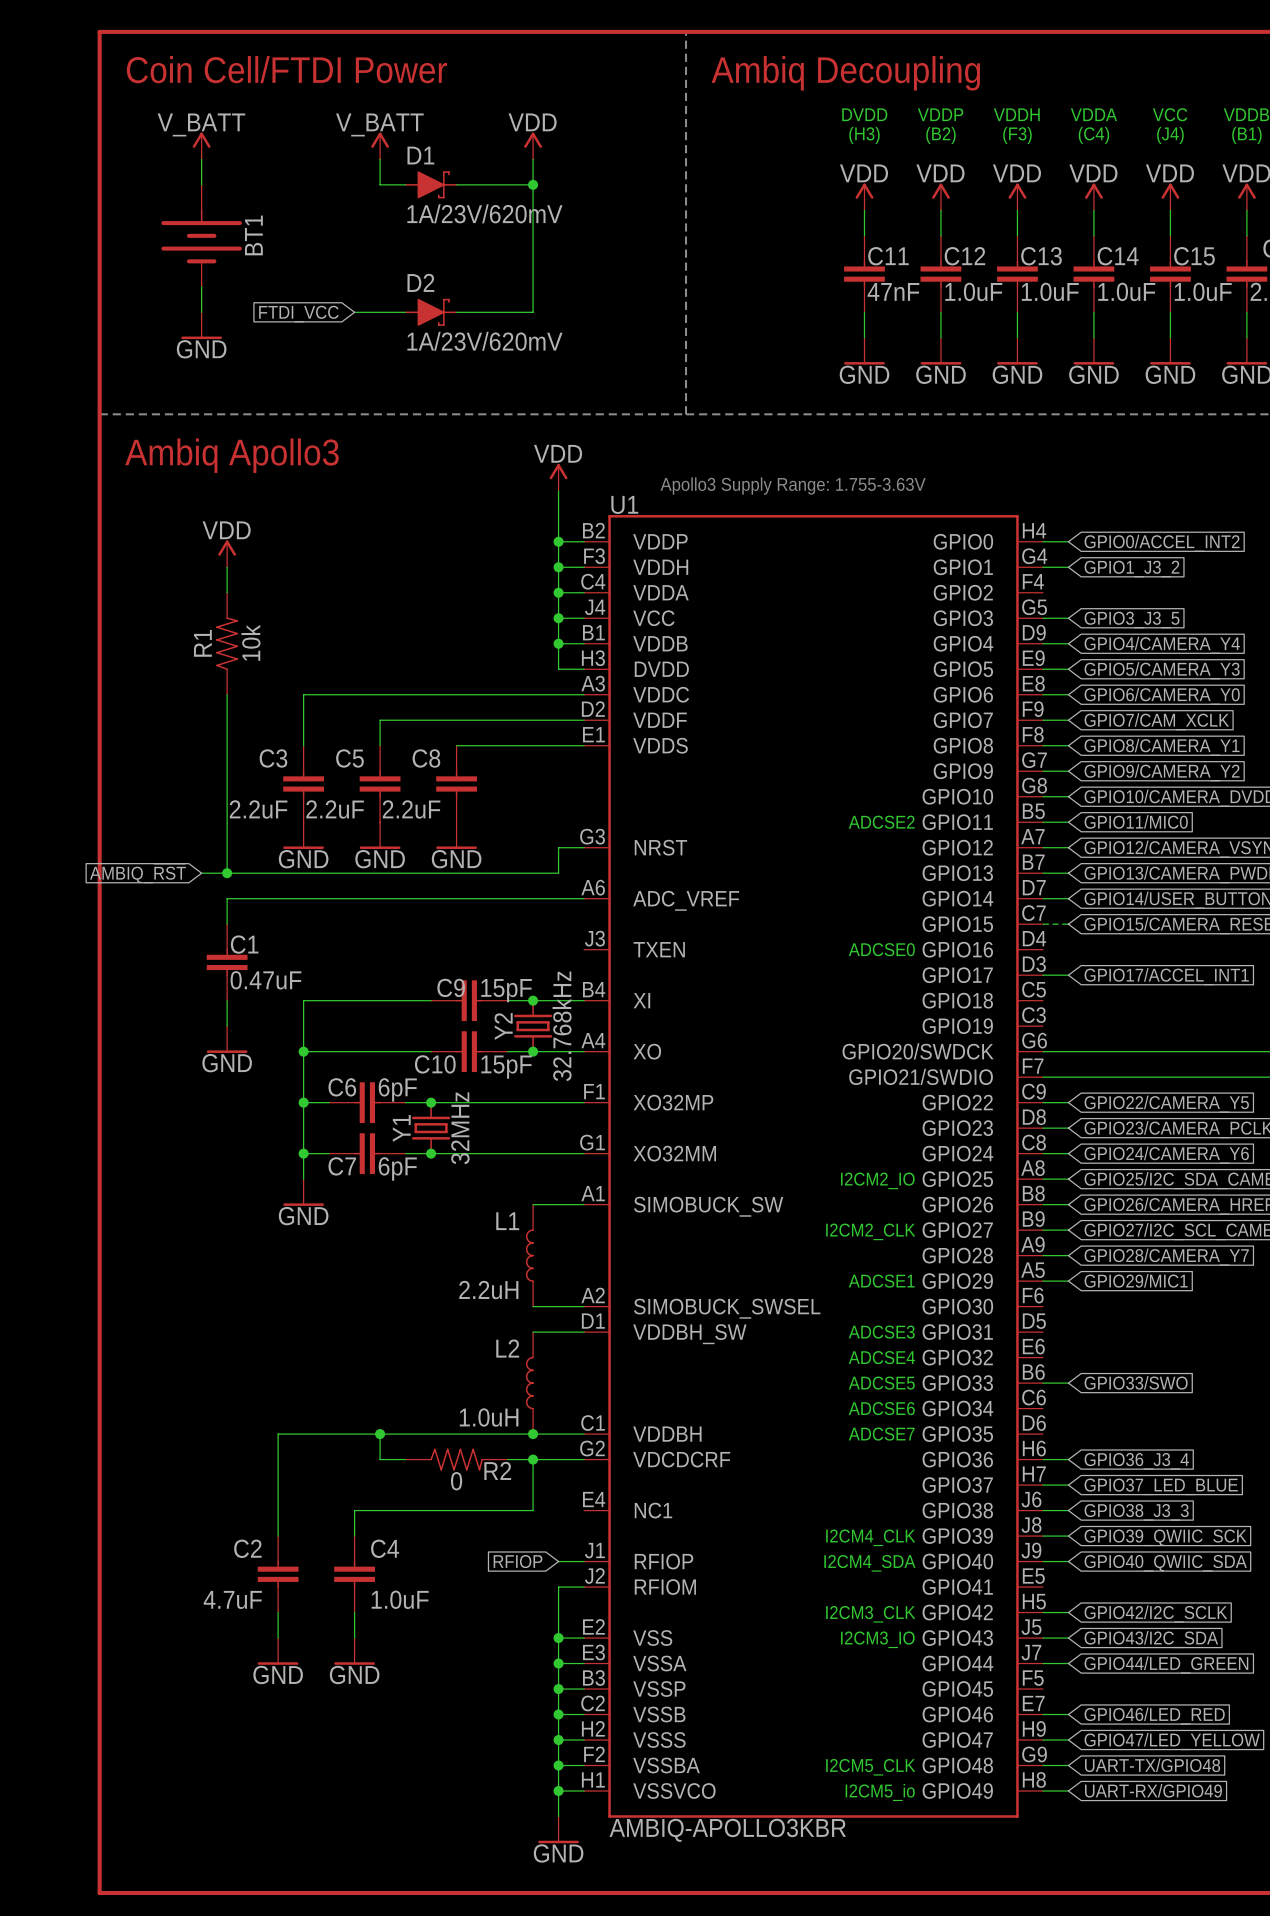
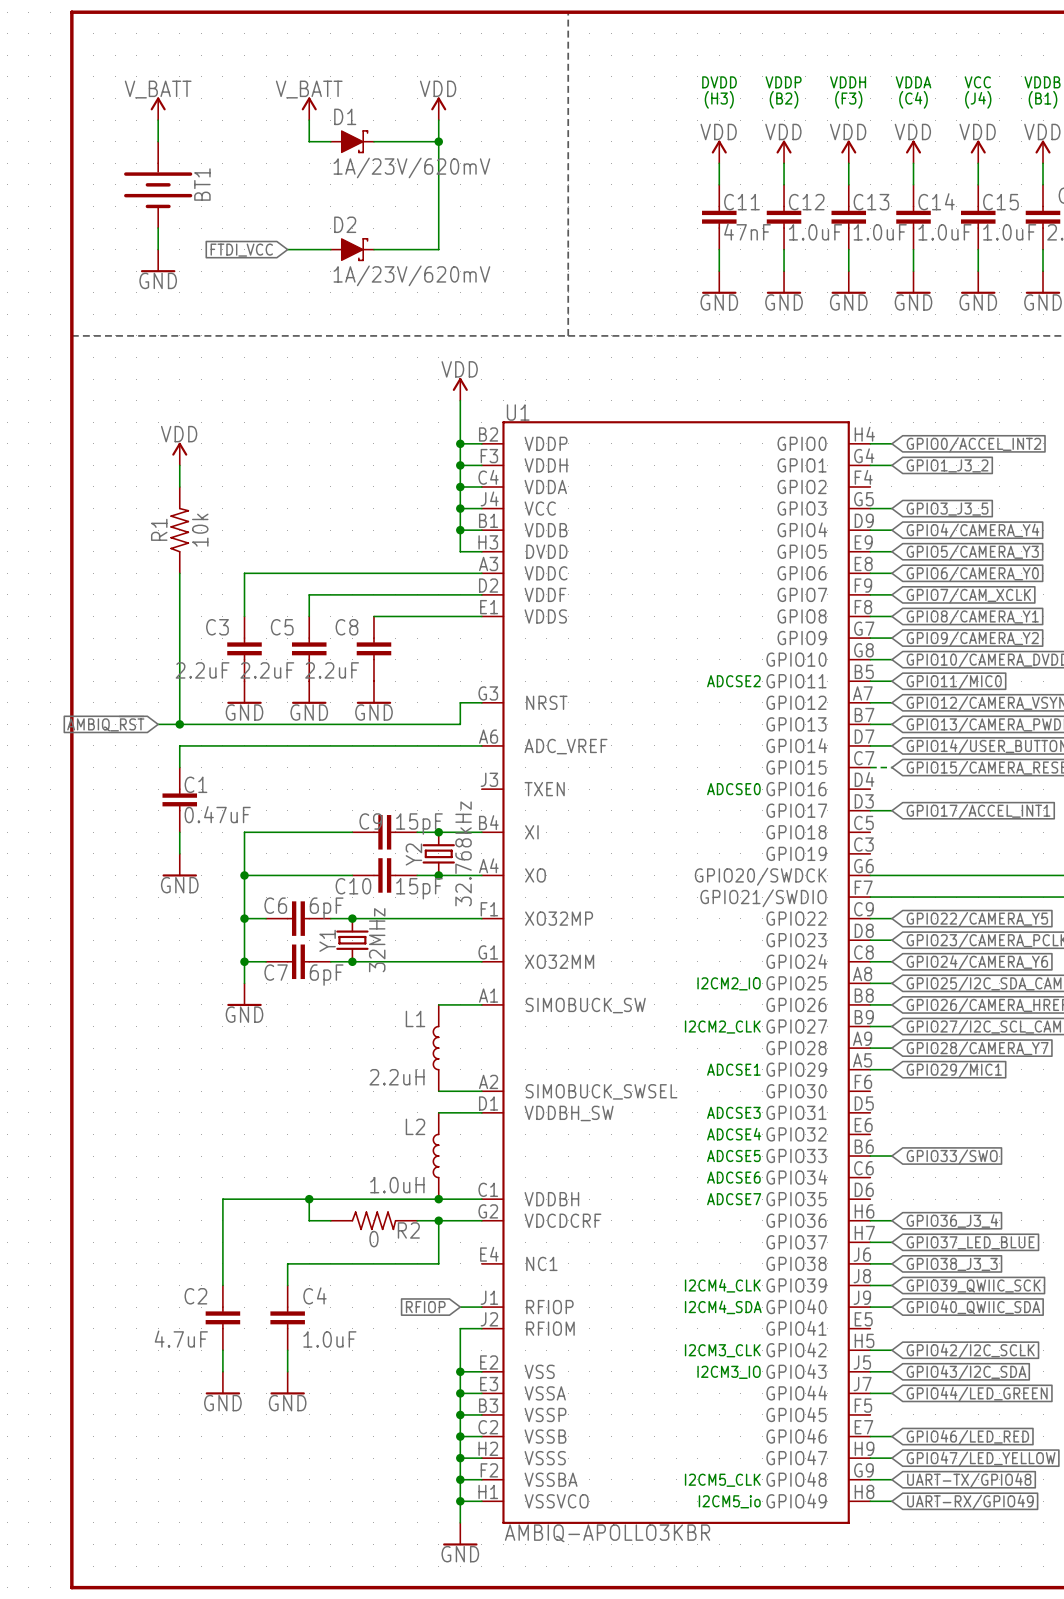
text: Coin Cell/FTDI Power (286, 69) -> none
text: Ambiq Decoupling (845, 73) -> none
text: Ambiq Apollo3 (231, 455) -> none
text: Apollo3 Supply Range: 1.755-3.63V (793, 486) -> none

